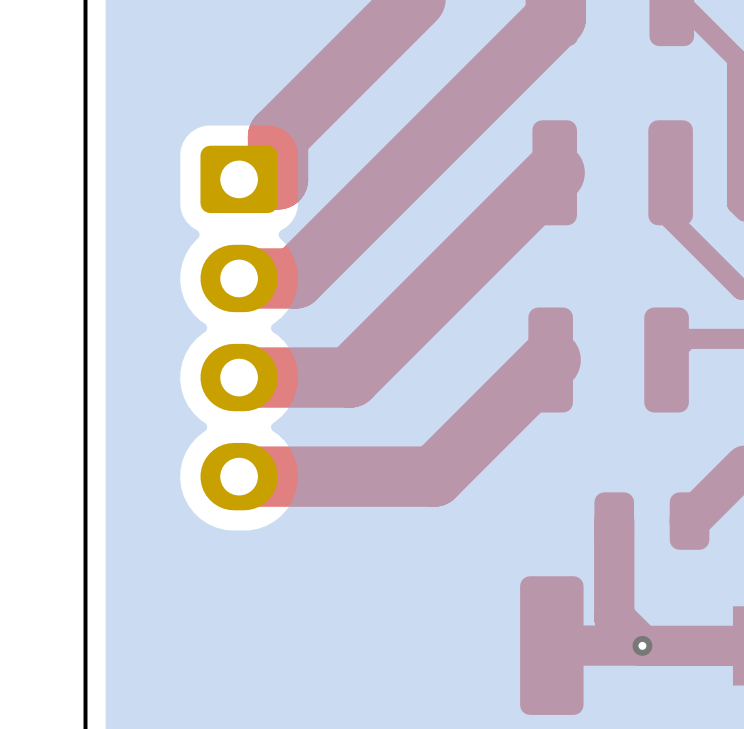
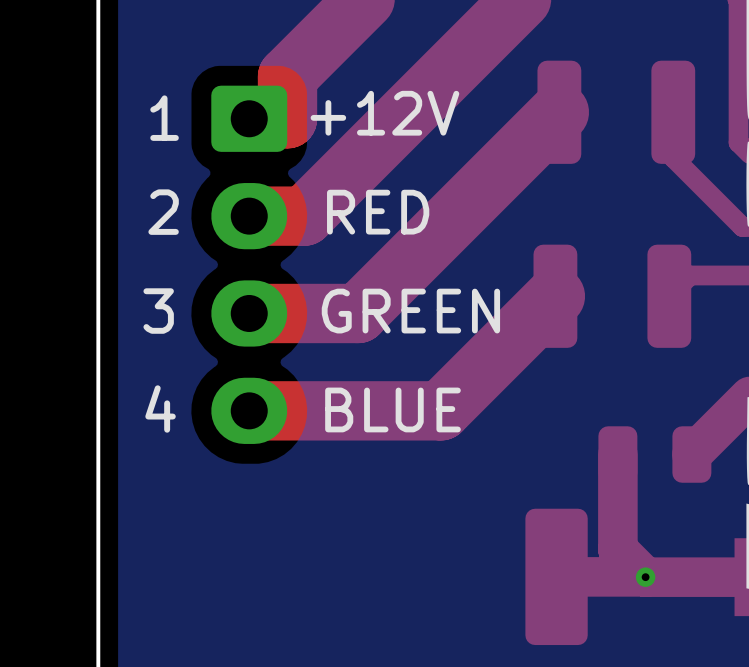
text: none -> +12V (384, 113)
text: none -> 1 (164, 118)
text: none -> 2 (163, 212)
text: none -> RED (378, 212)
text: none -> 3 (158, 311)
text: none -> GREEN (410, 311)
text: none -> 4 (160, 409)
text: none -> BLUE (392, 409)

